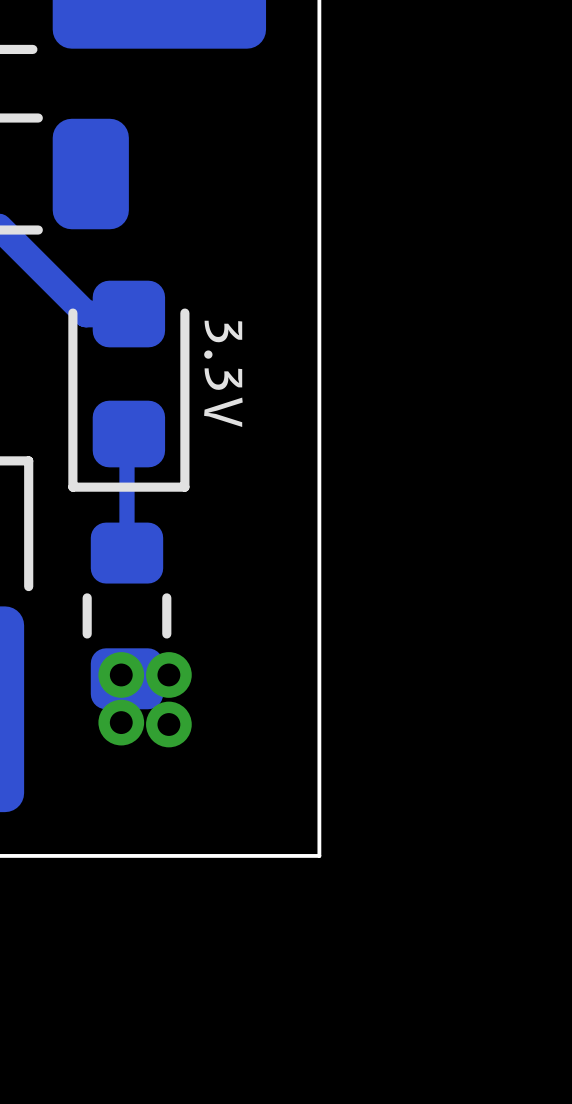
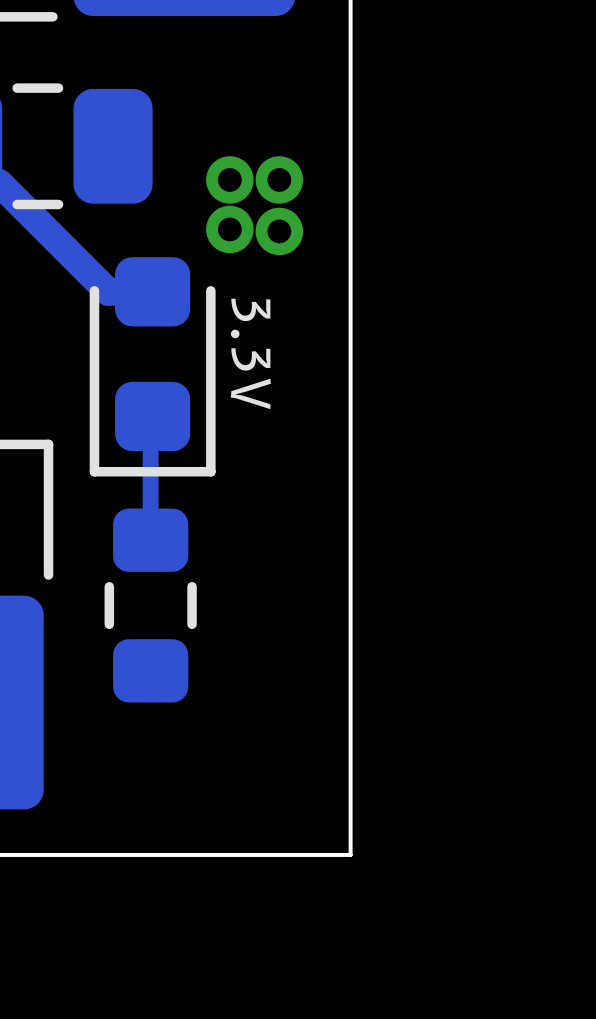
via: none -> (229, 179)
via: none -> (279, 179)
via: none -> (229, 229)
via: none -> (279, 231)
via: (121, 674) -> none
via: (168, 674) -> none
via: (121, 722) -> none
via: (168, 724) -> none

